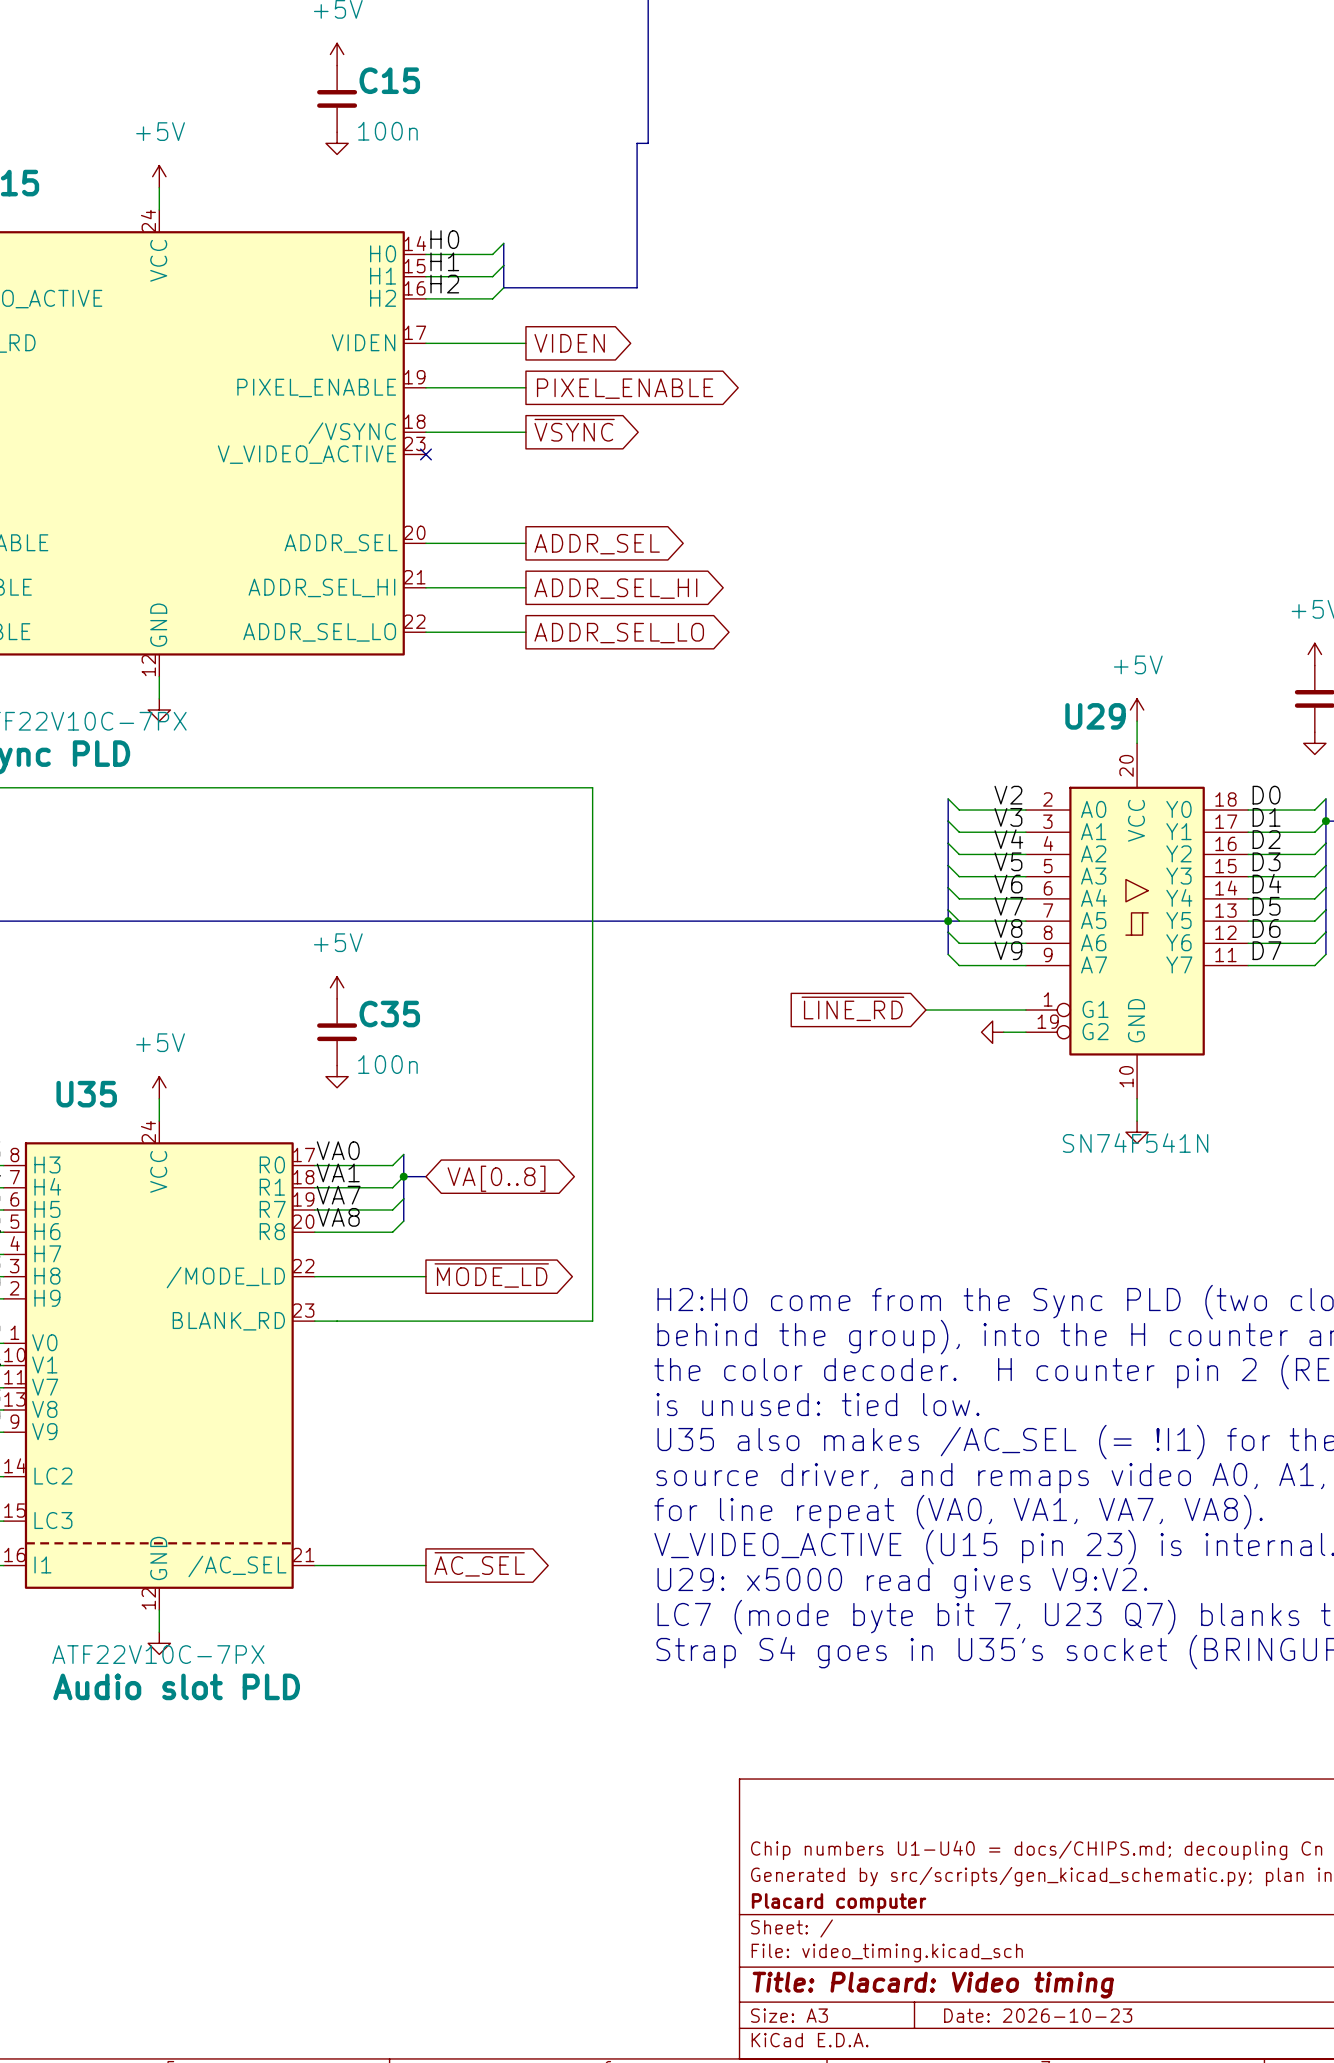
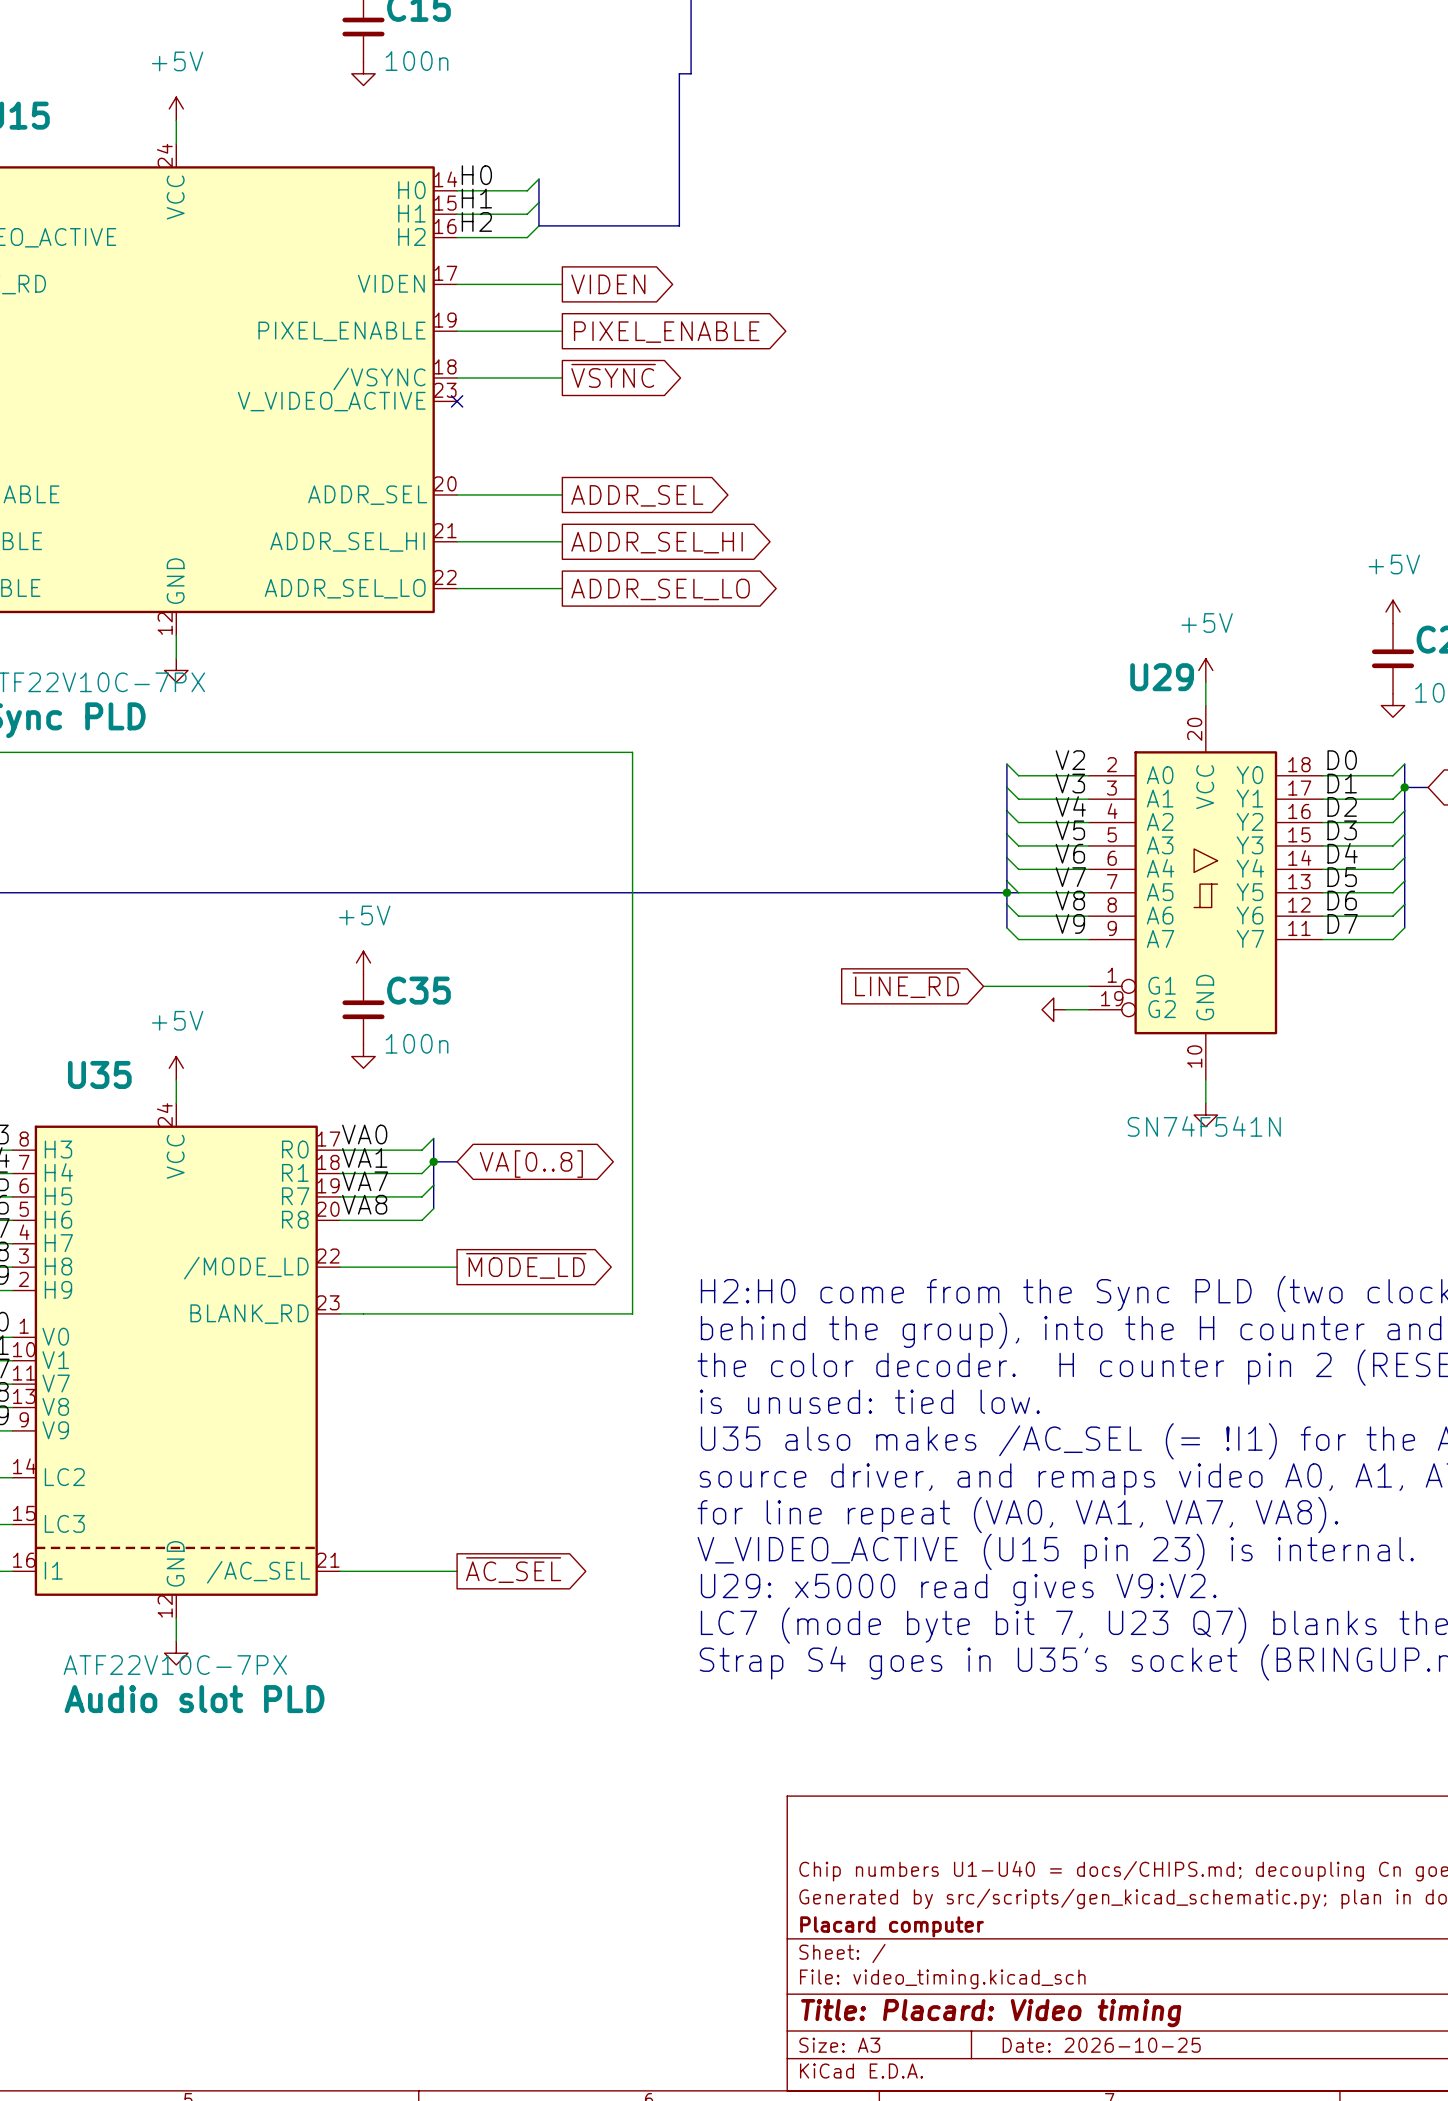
title block: Date: 2026-10-23 (1038, 2015) -> Date: 2026-10-25 (1101, 2045)

